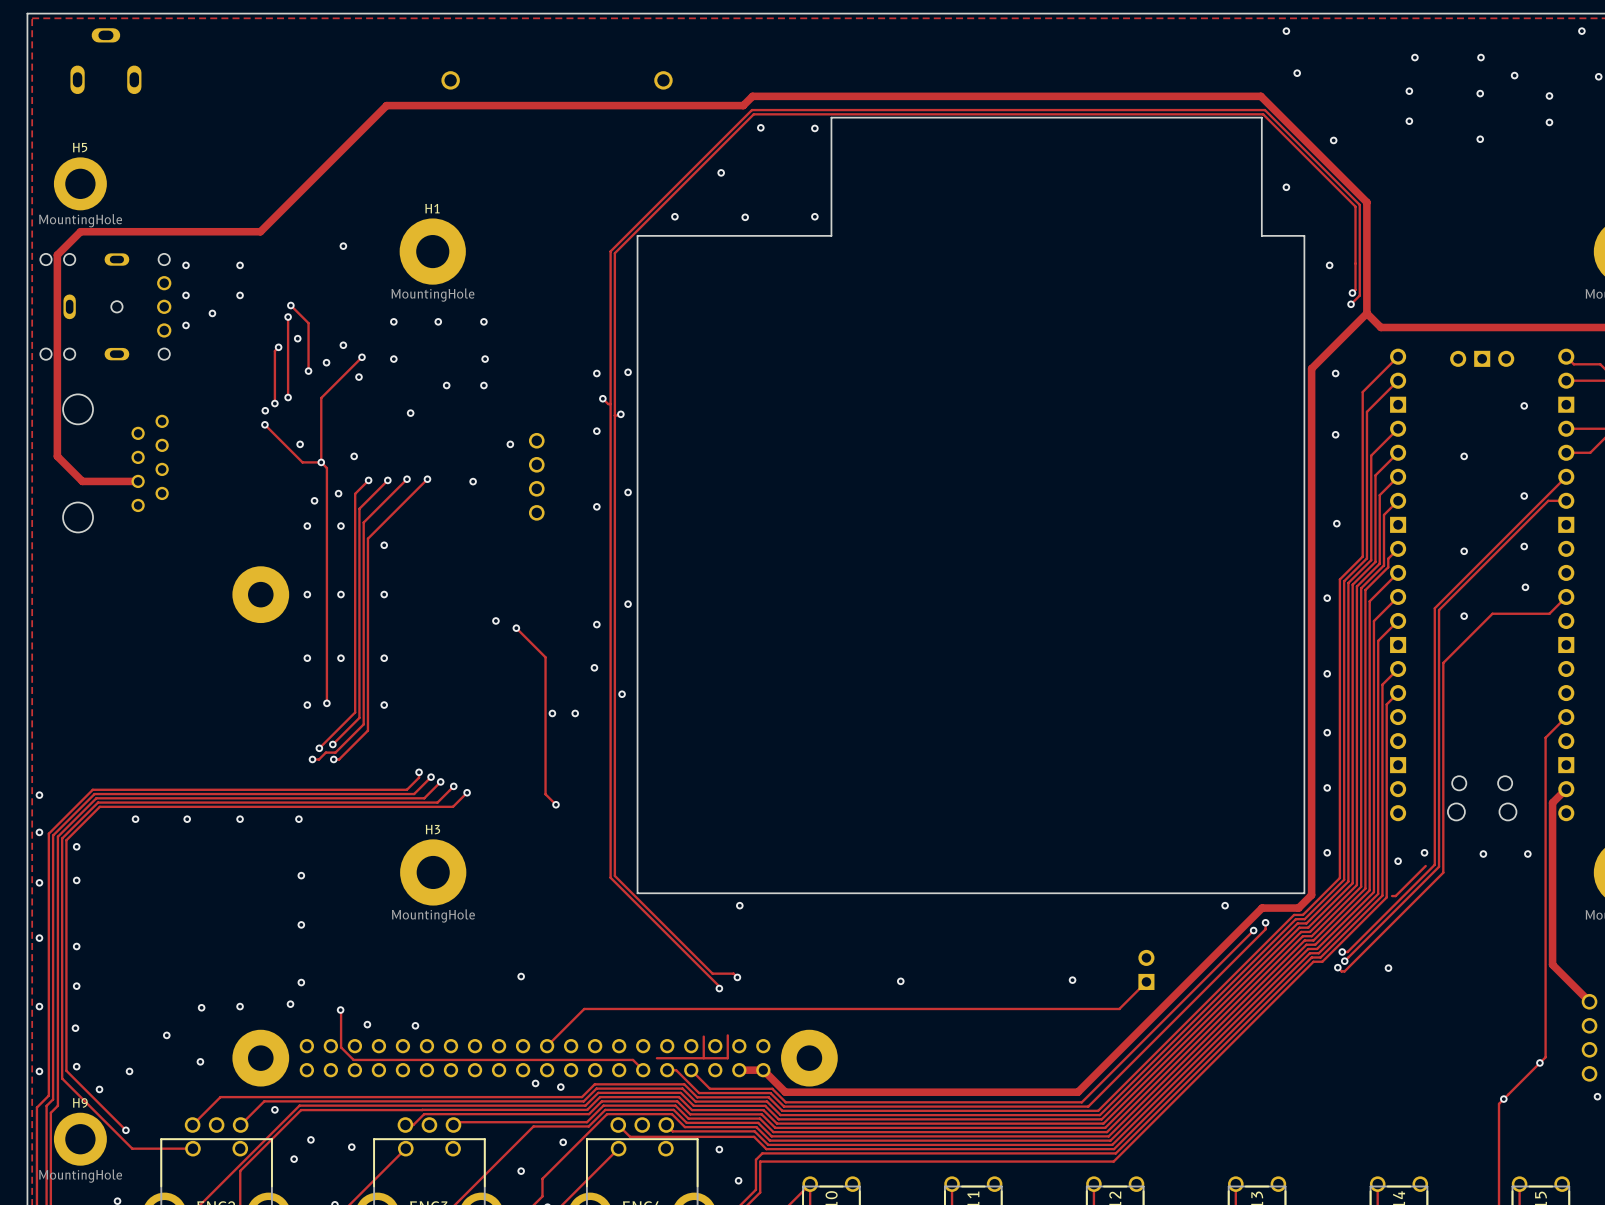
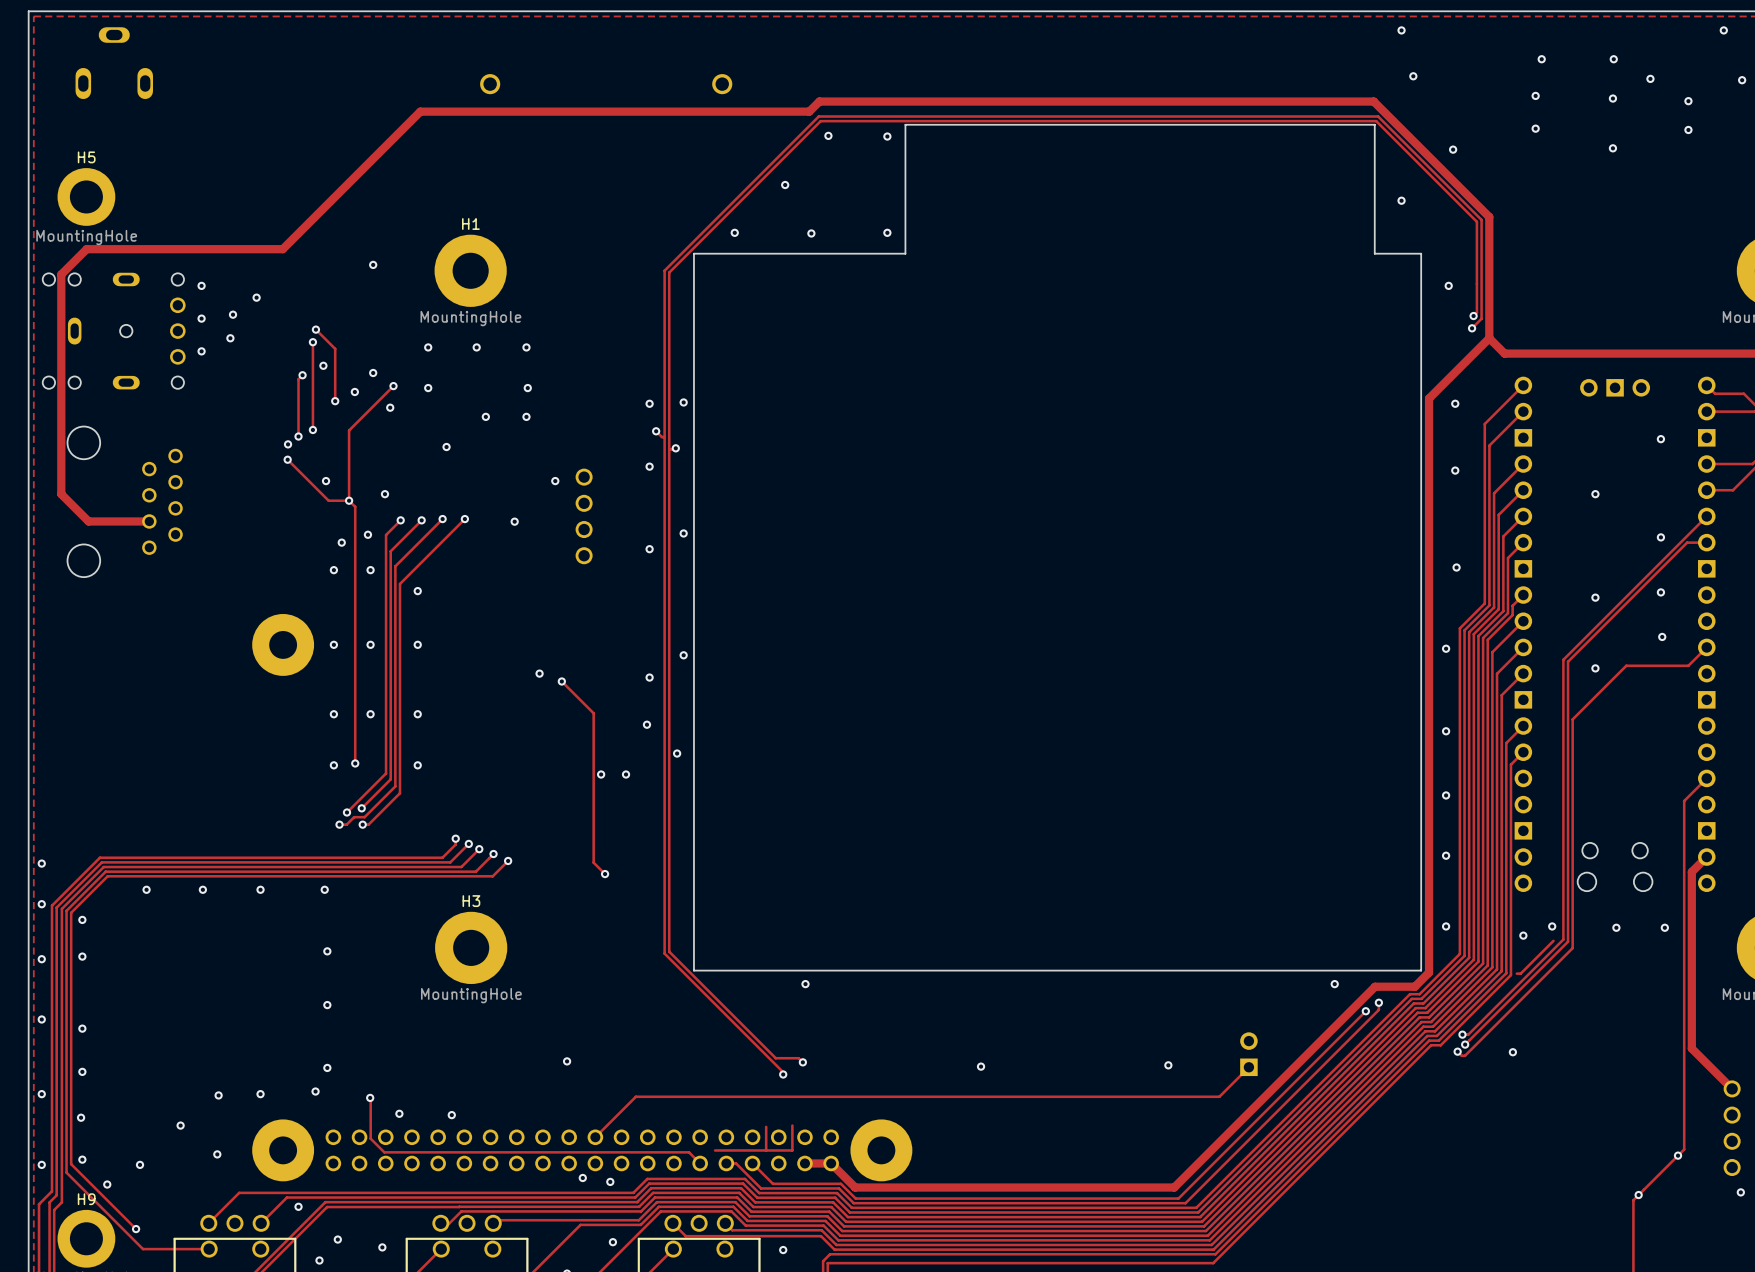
via: (240, 265) -> none
via: none -> (256, 297)
via: none -> (233, 314)
via: (240, 295) -> none

